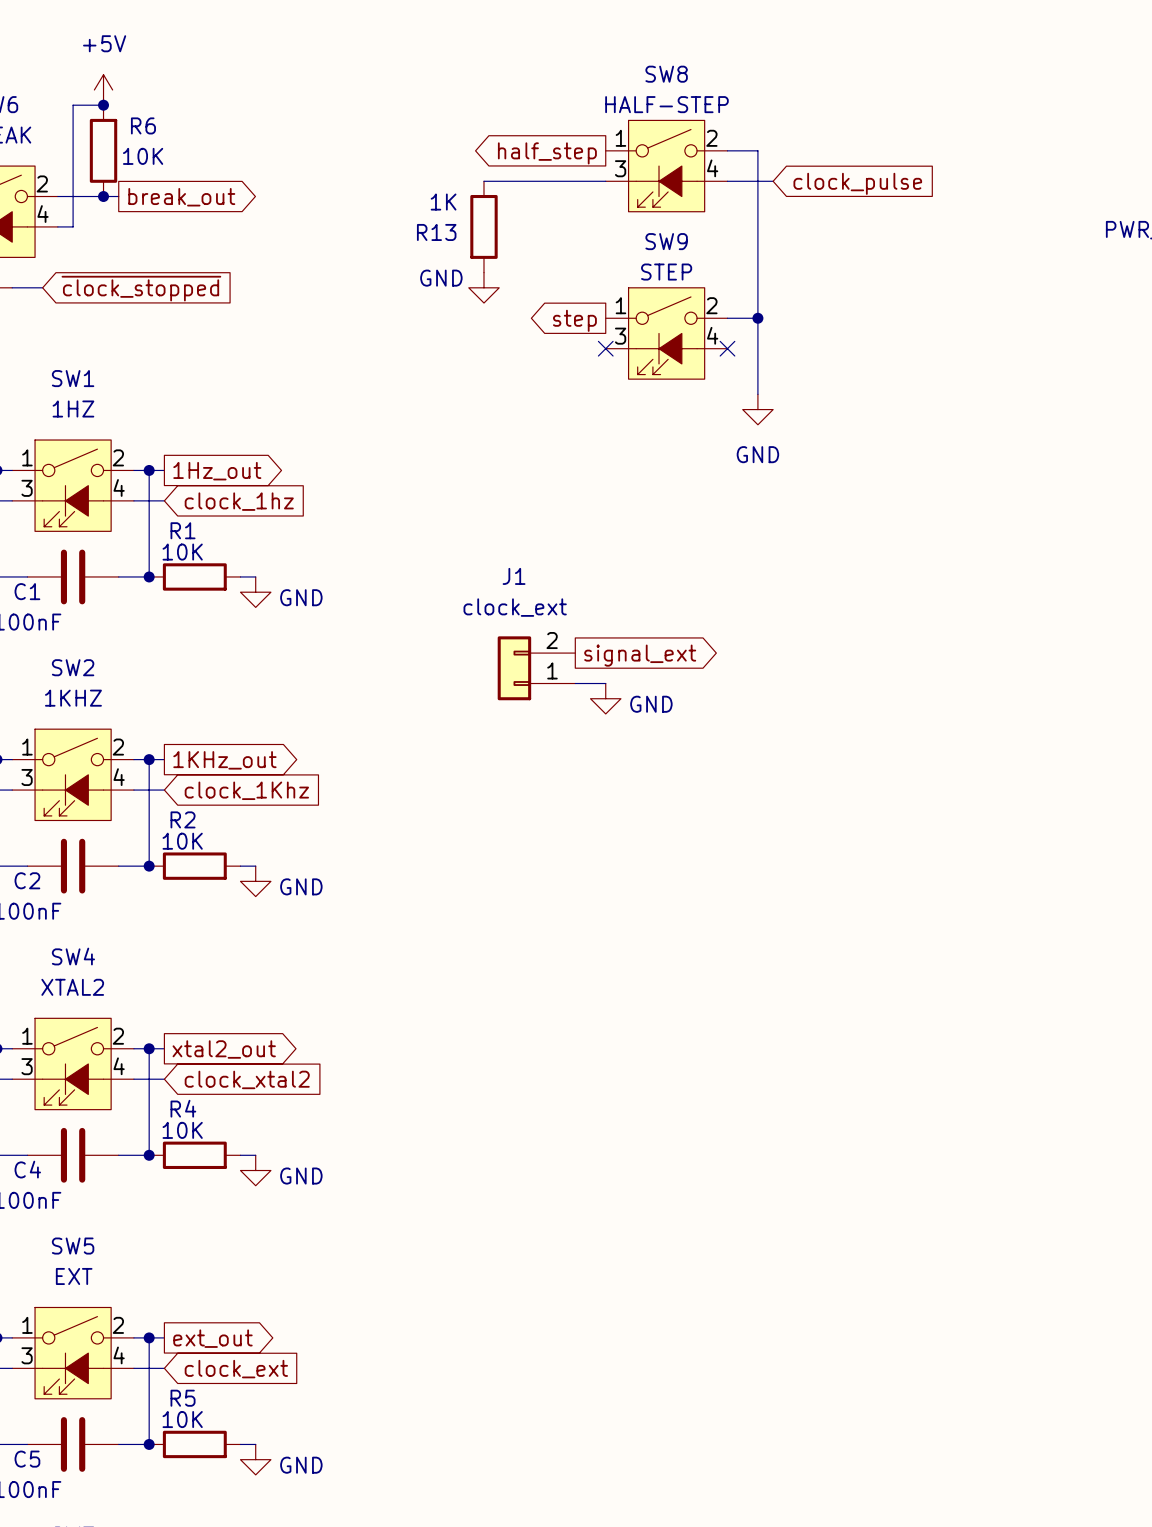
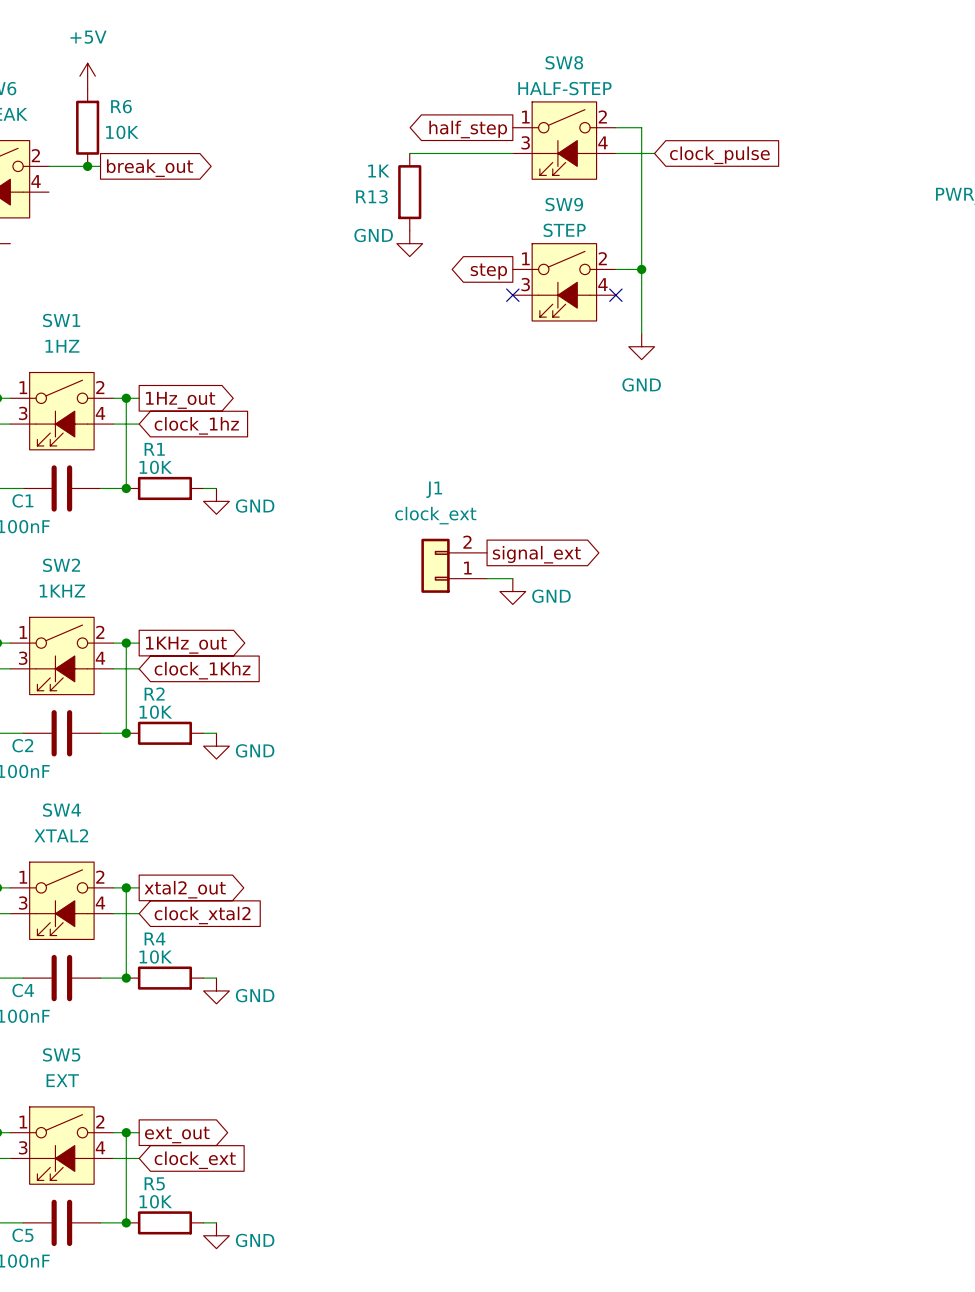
wire: (103, 105) (73, 105) (73, 226) (57, 226) -> none
junction: (103, 105) -> none
wire: (12, 287) (42, 287) -> none
global label: ~{clock_stopped} (141, 288) -> none

